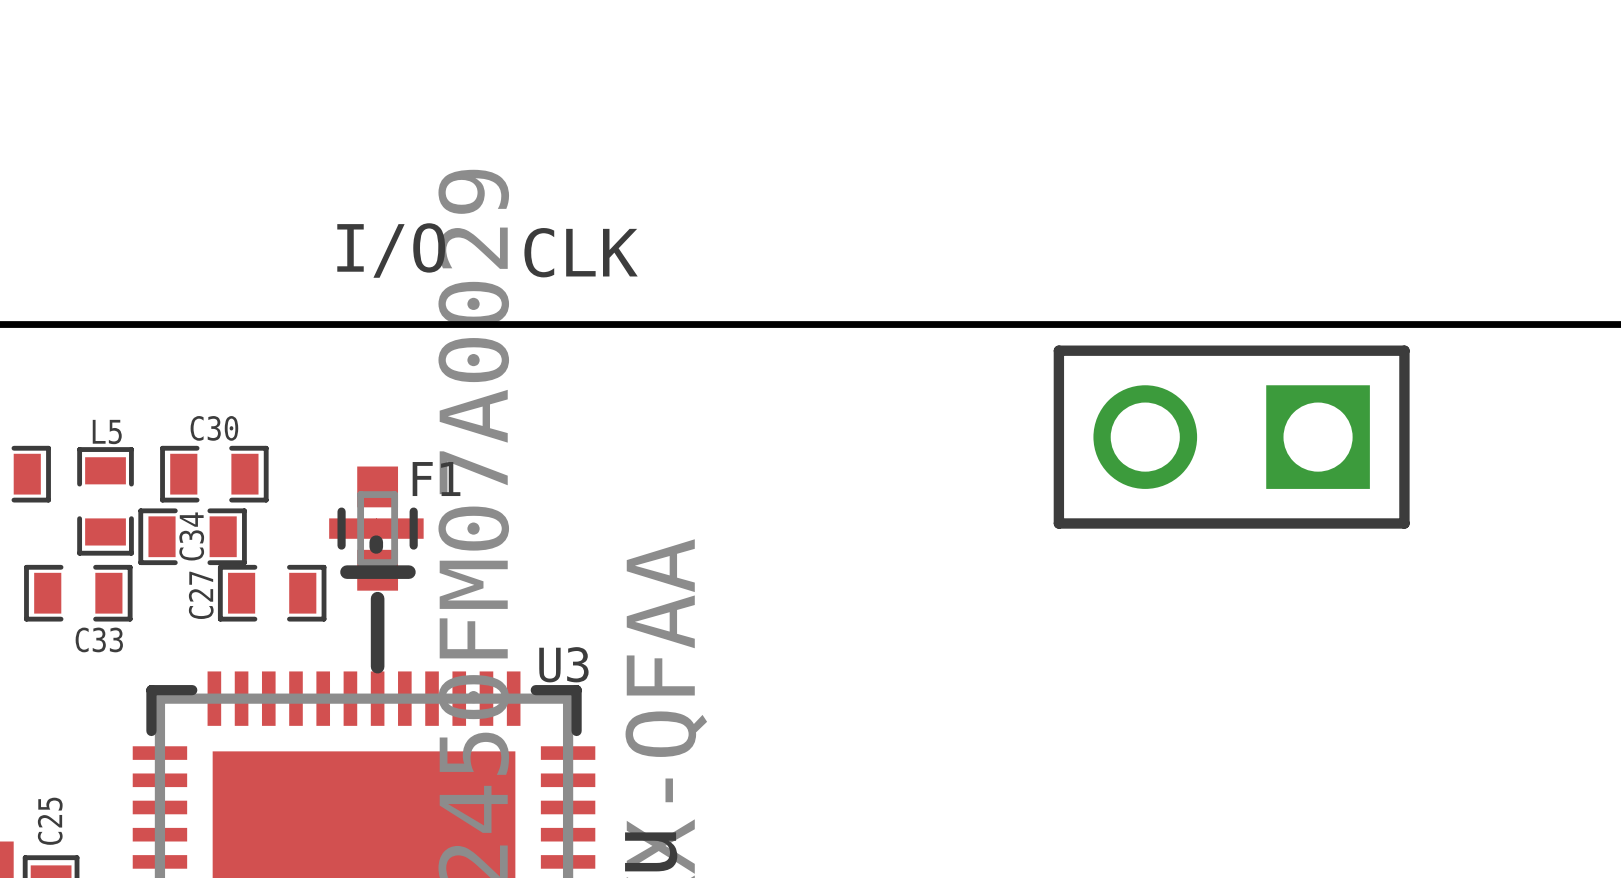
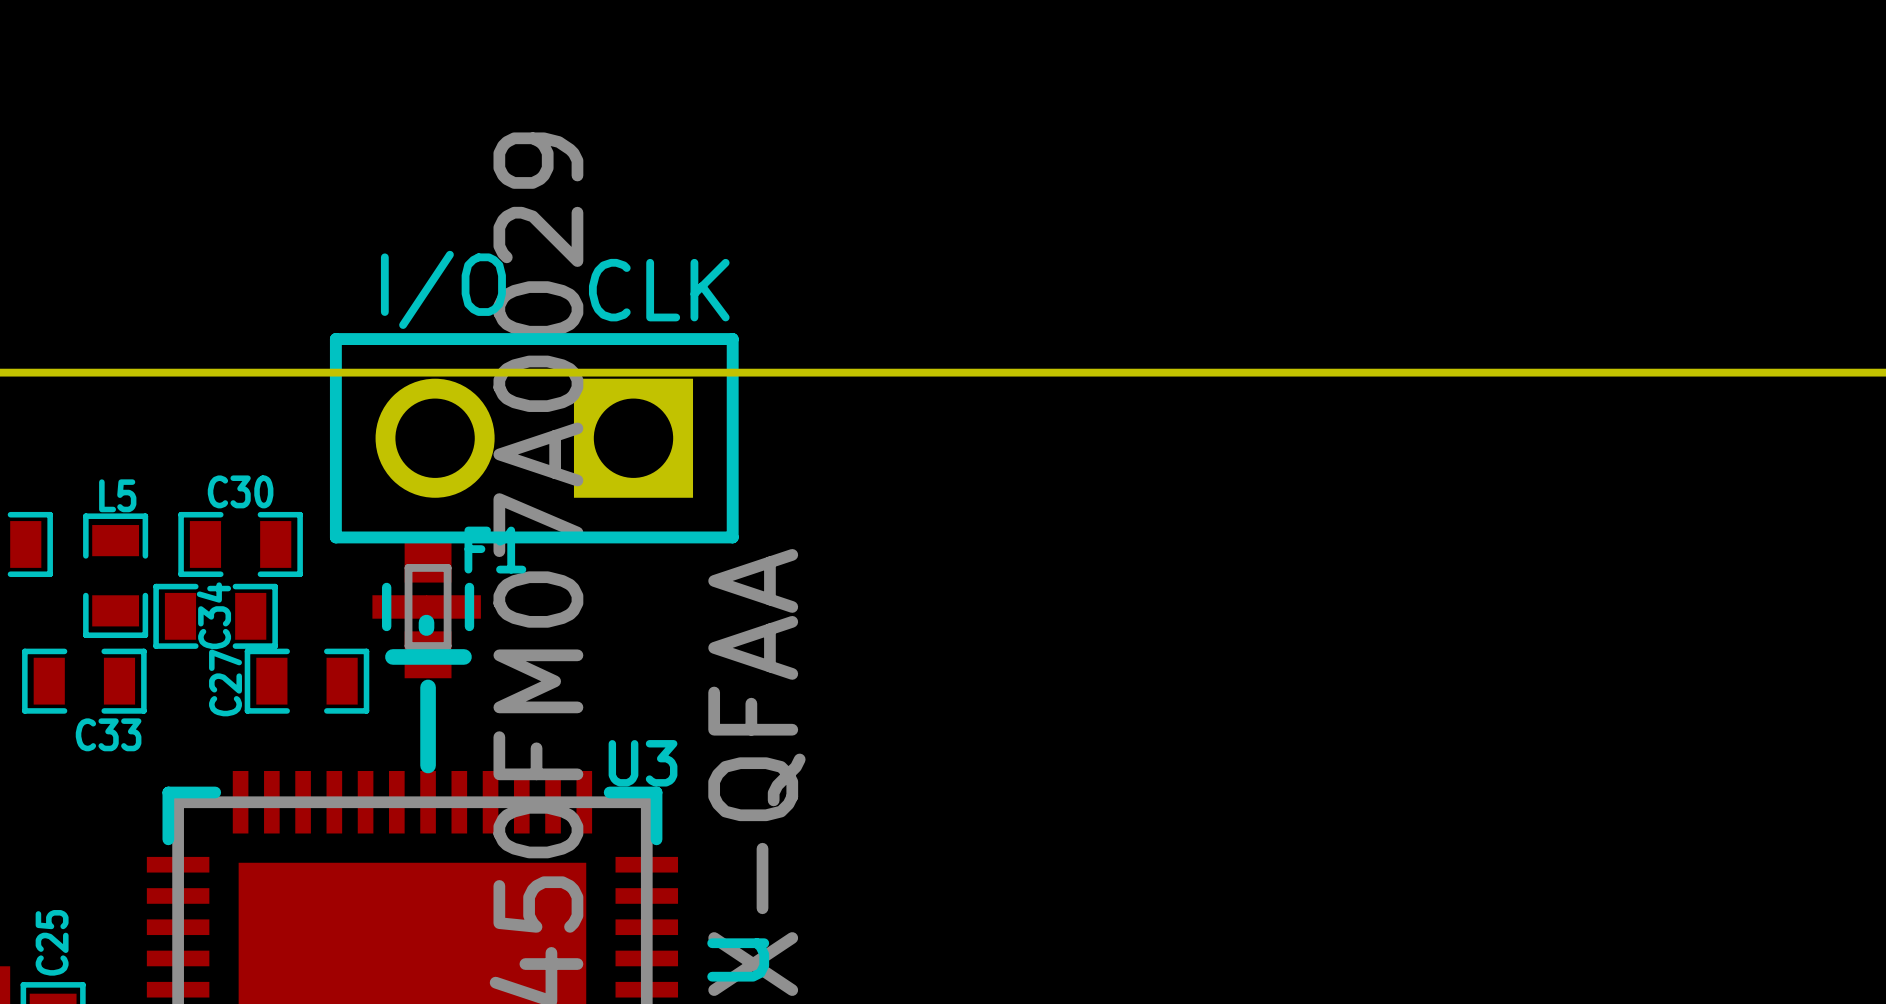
part position: (1231, 437) -> (534, 438)

